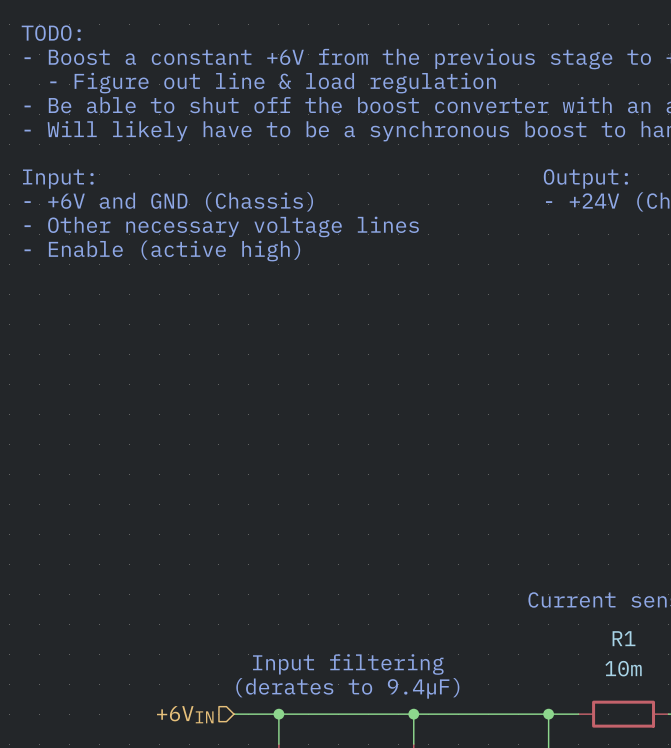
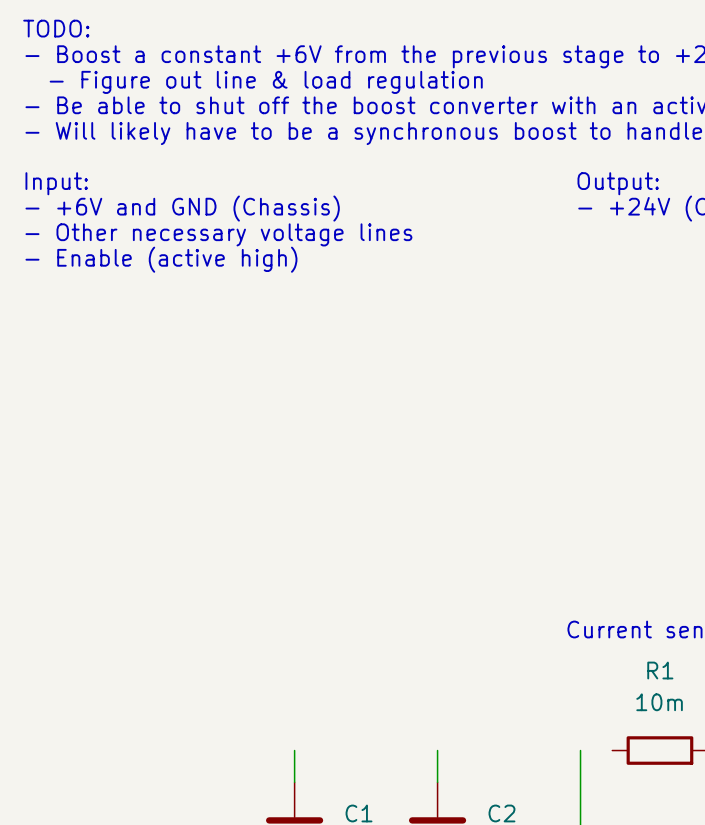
text: Input filtering (348, 664) -> none
text: (derates to 9.4µF) (347, 688) -> none
hierarchical label: +6VIN (185, 714) -> none
wire: (233, 714) (578, 714) -> none
junction: (278, 714) -> none
junction: (413, 714) -> none
junction: (548, 714) -> none

